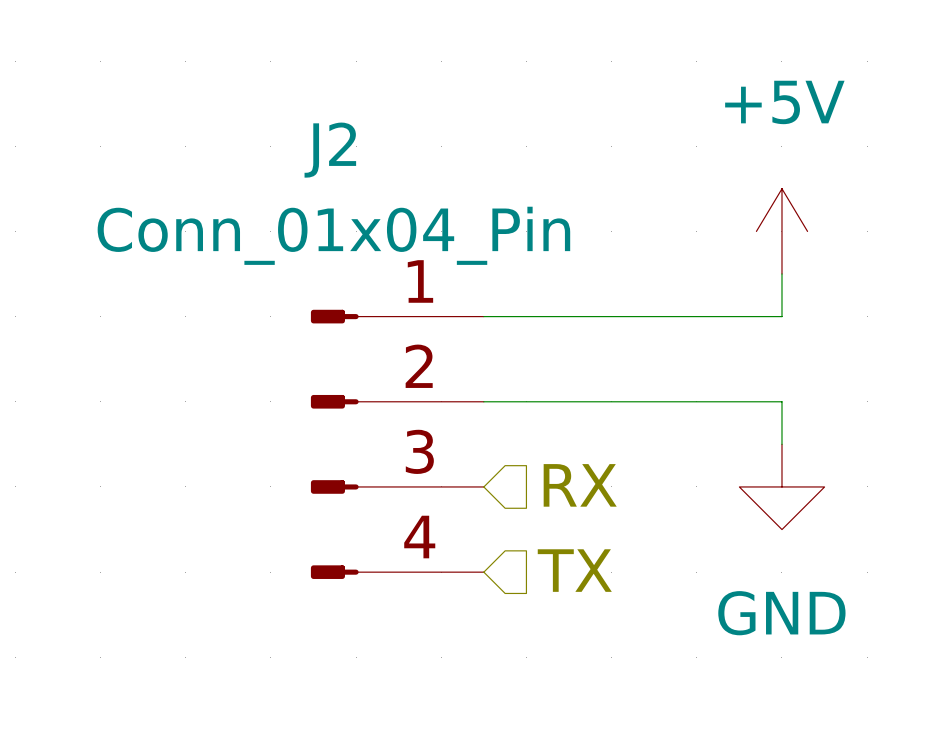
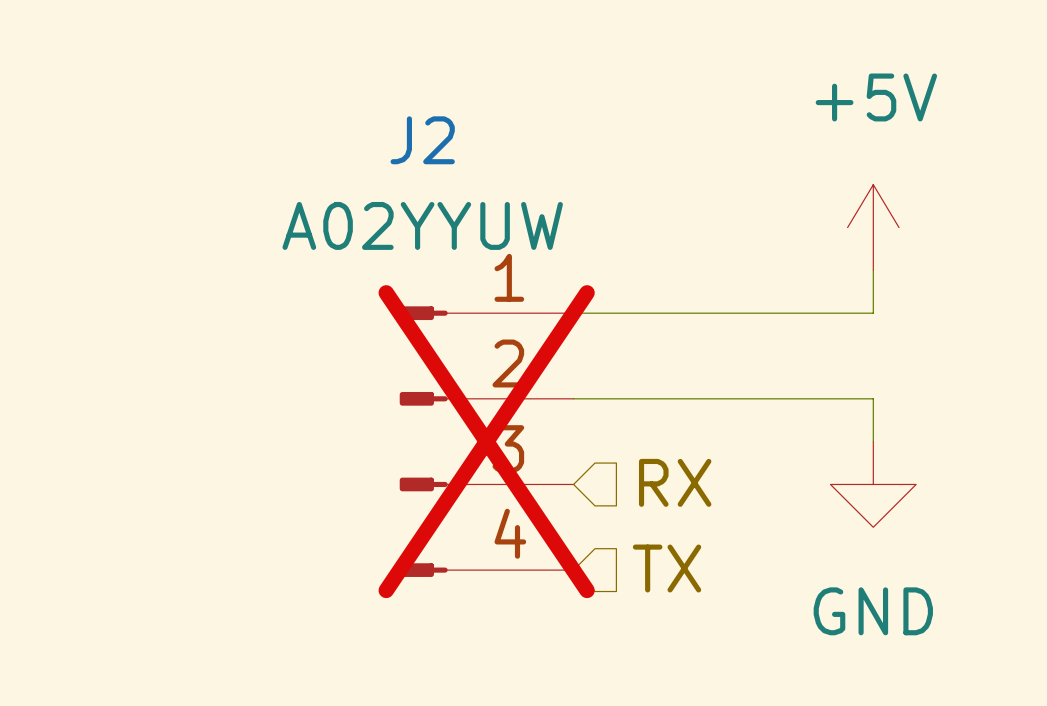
J2 value: Conn_01x04_Pin (333, 235) -> A02YYUW (422, 225)
J2 do-not-place cross: none -> (486, 441)

